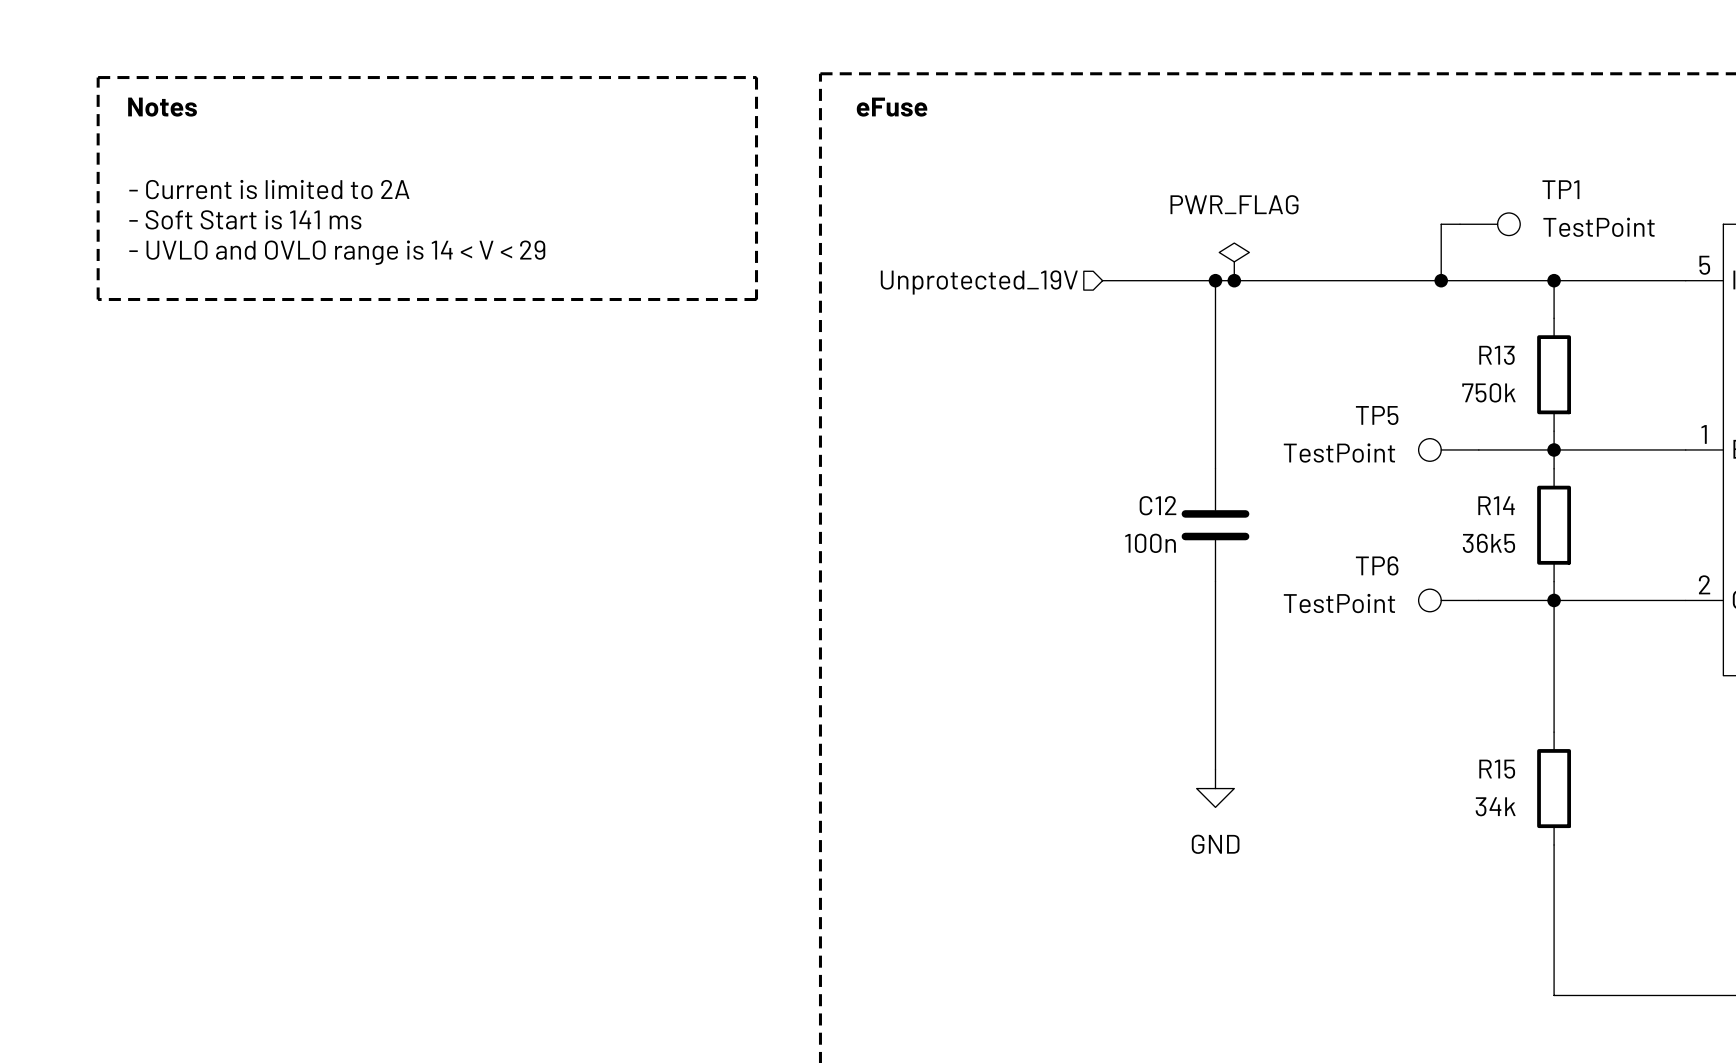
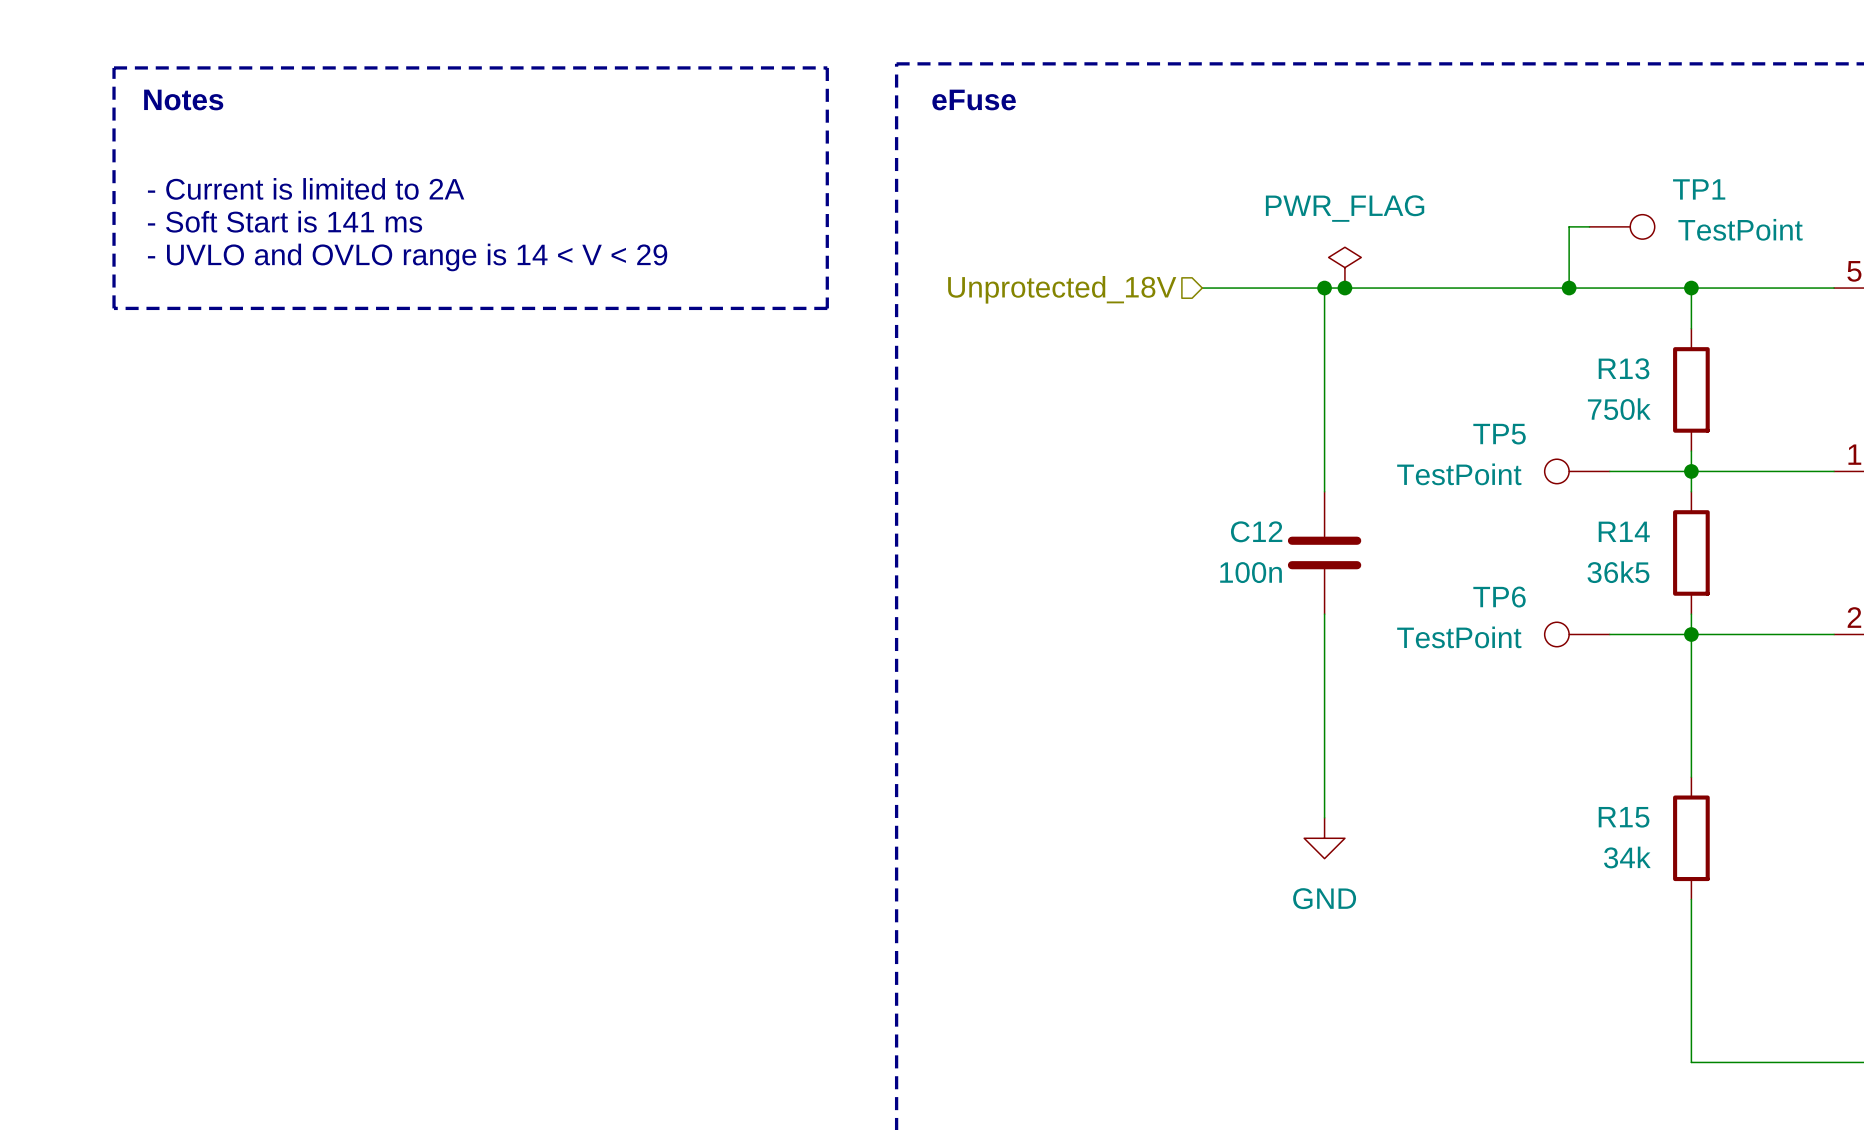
hierarchical label: Unprotected_19V (979, 282) -> Unprotected_18V (1062, 289)

